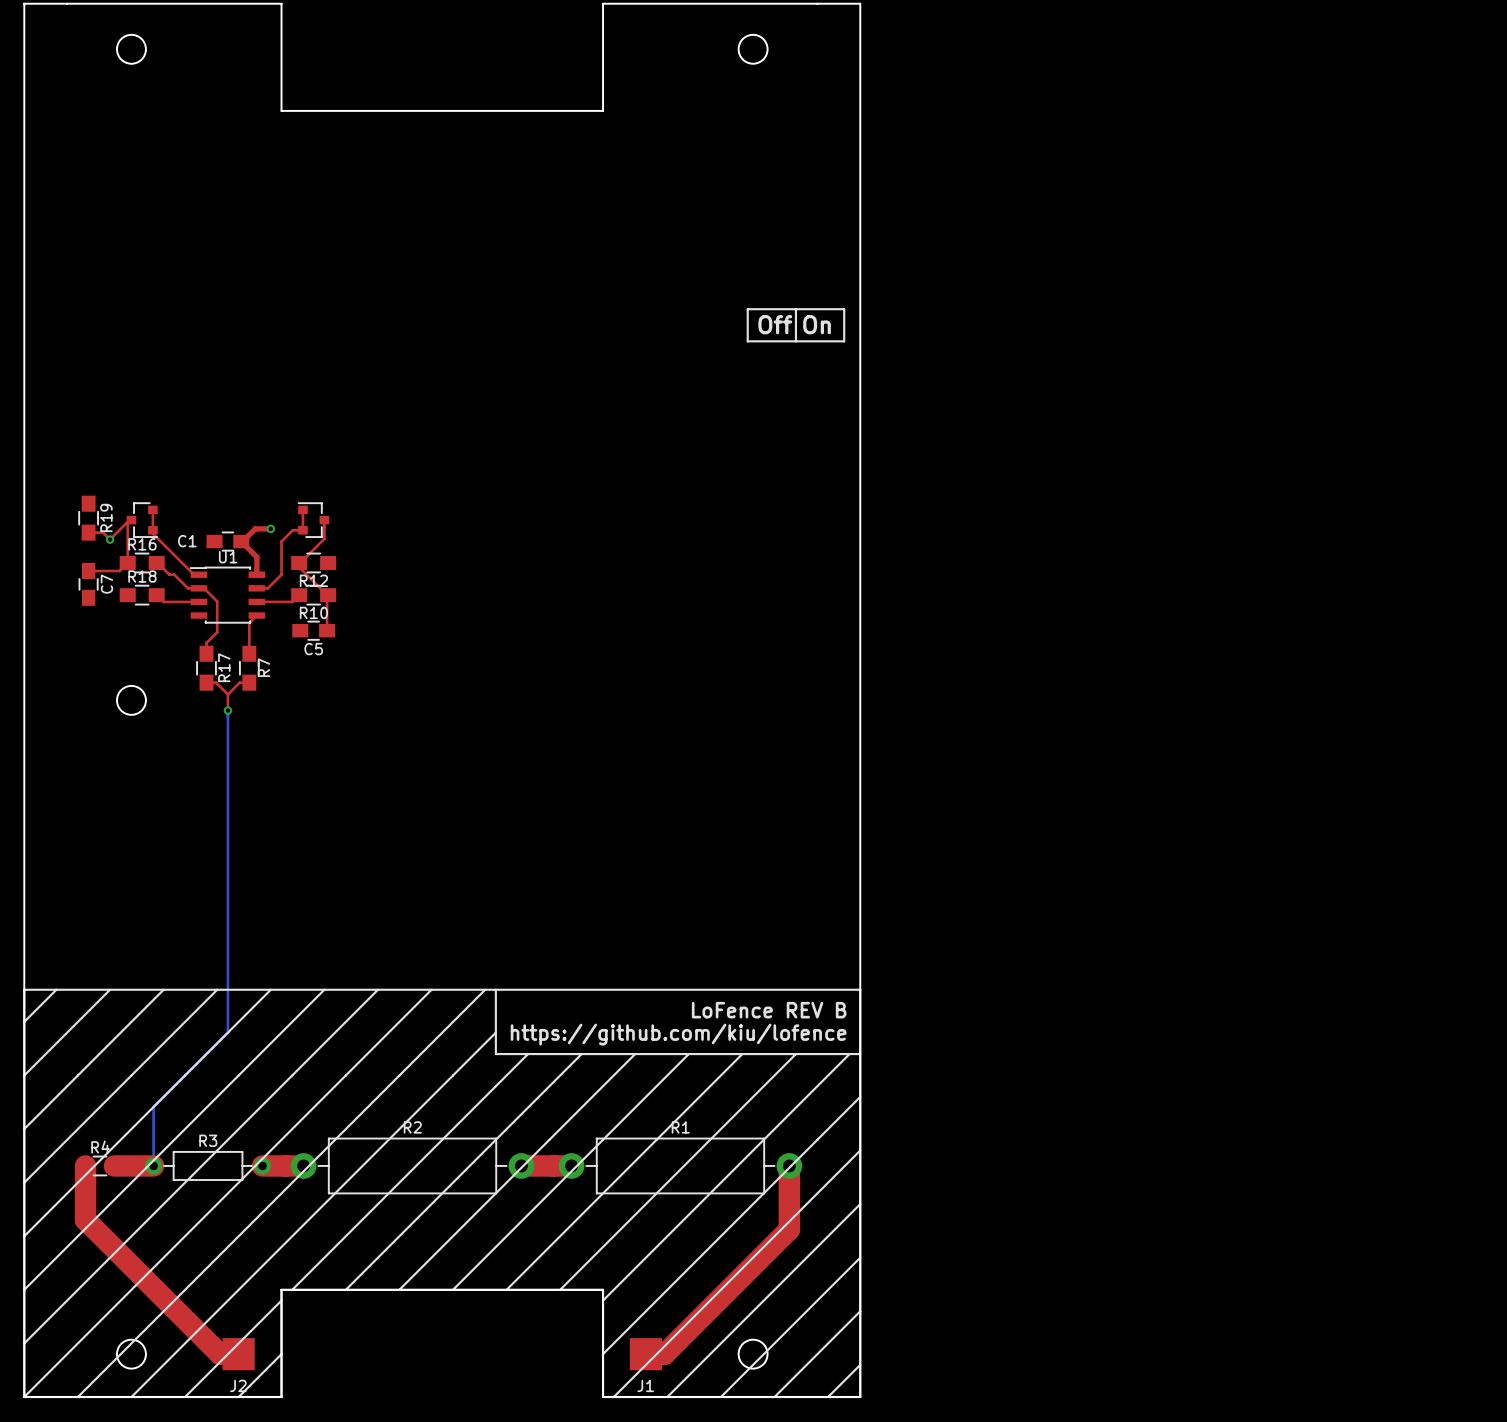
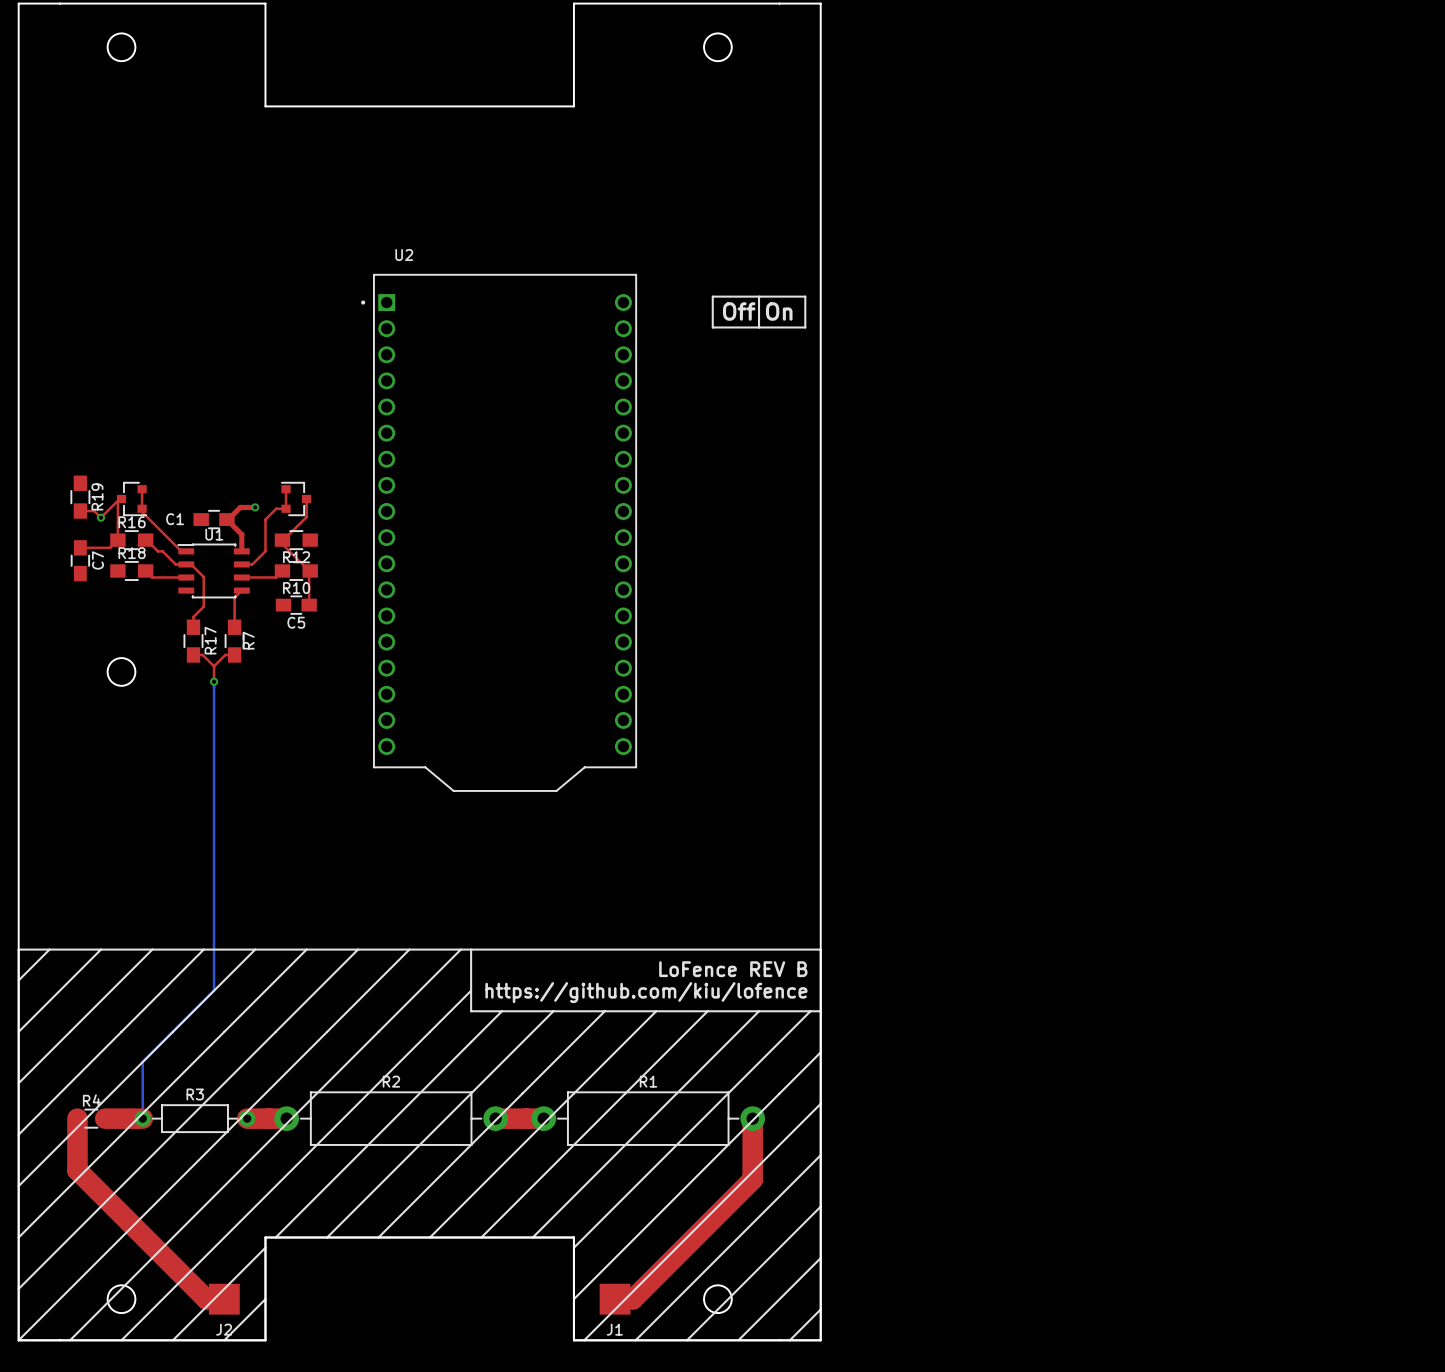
U2: none -> (498, 532)

